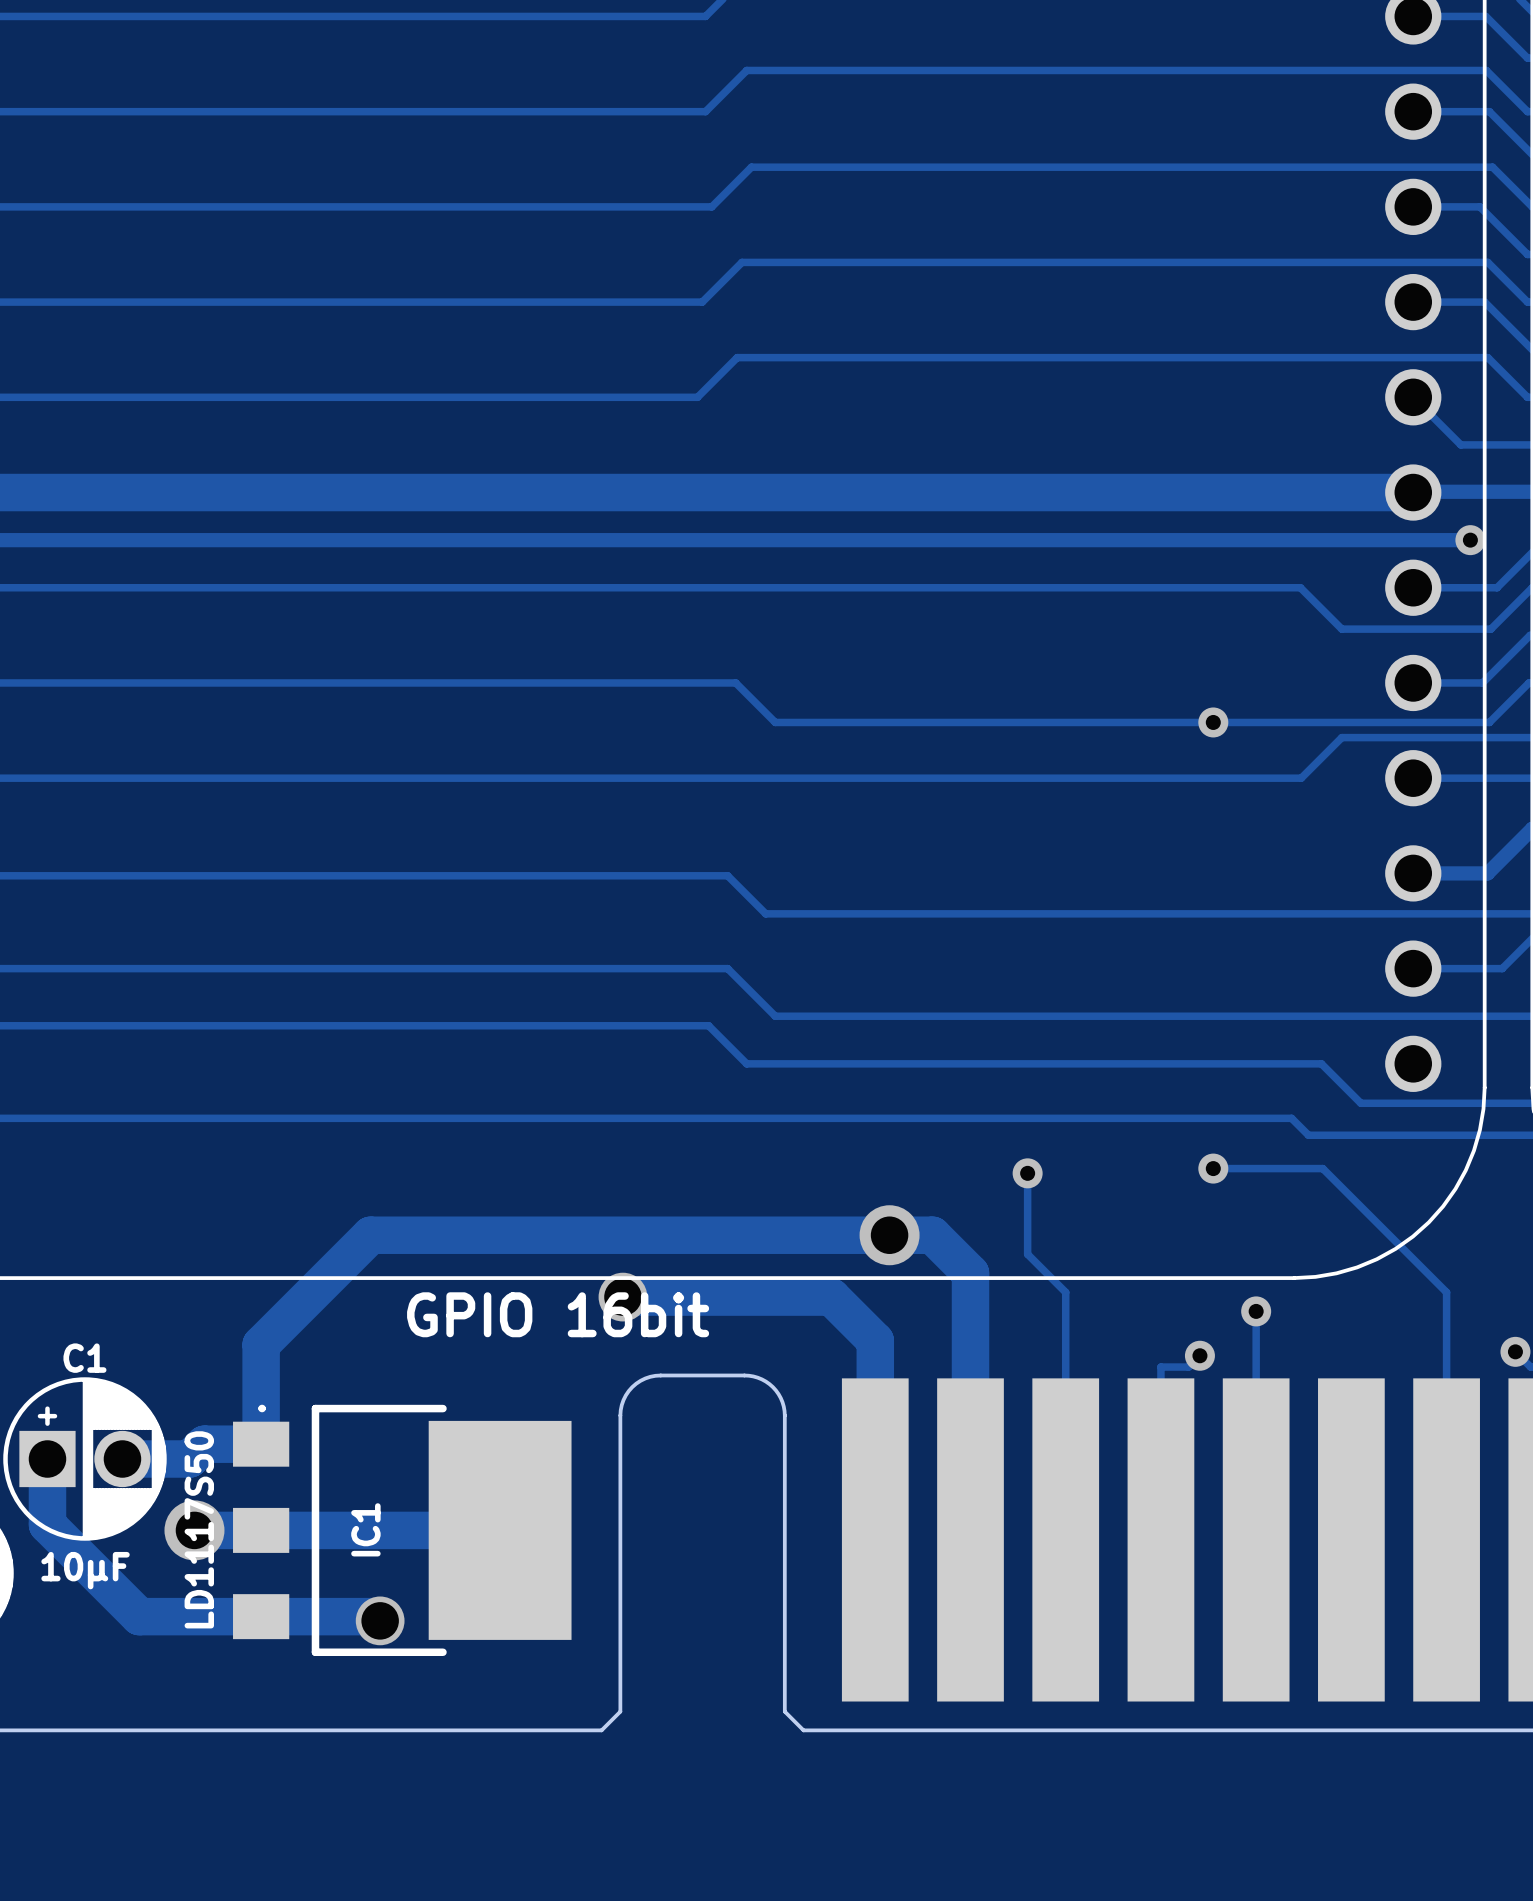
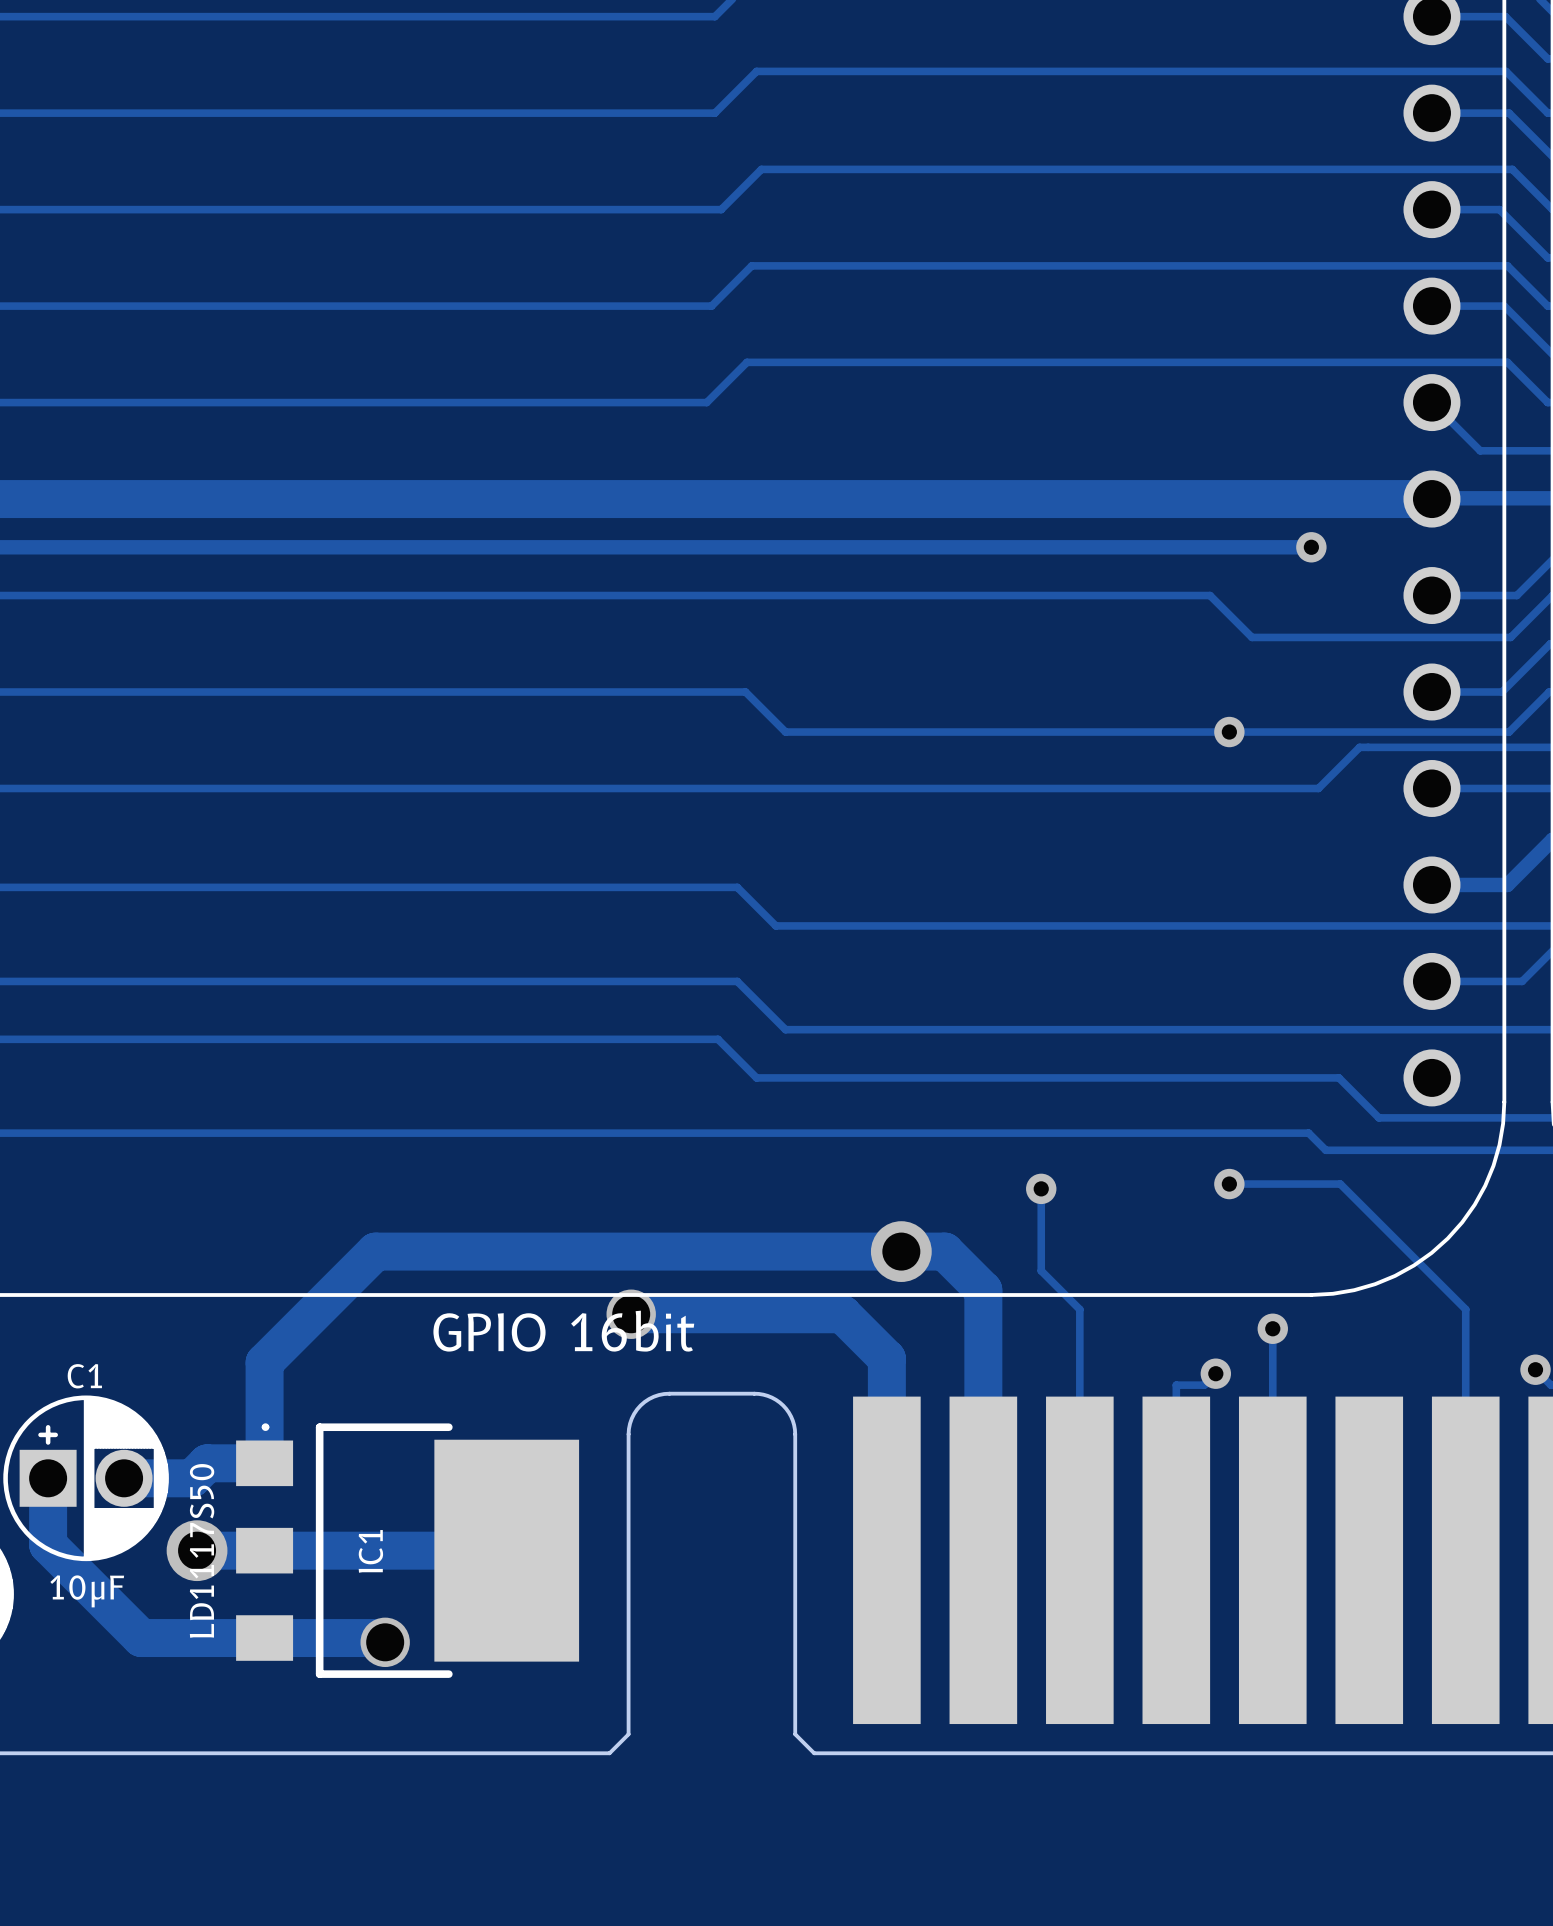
track: (1294, 540) (1470, 540) -> none
via position: (1470, 540) -> (1311, 547)
track: (1194, 587) (1300, 587) (1341, 629) -> (1210, 595) (1251, 637) (1359, 637)

